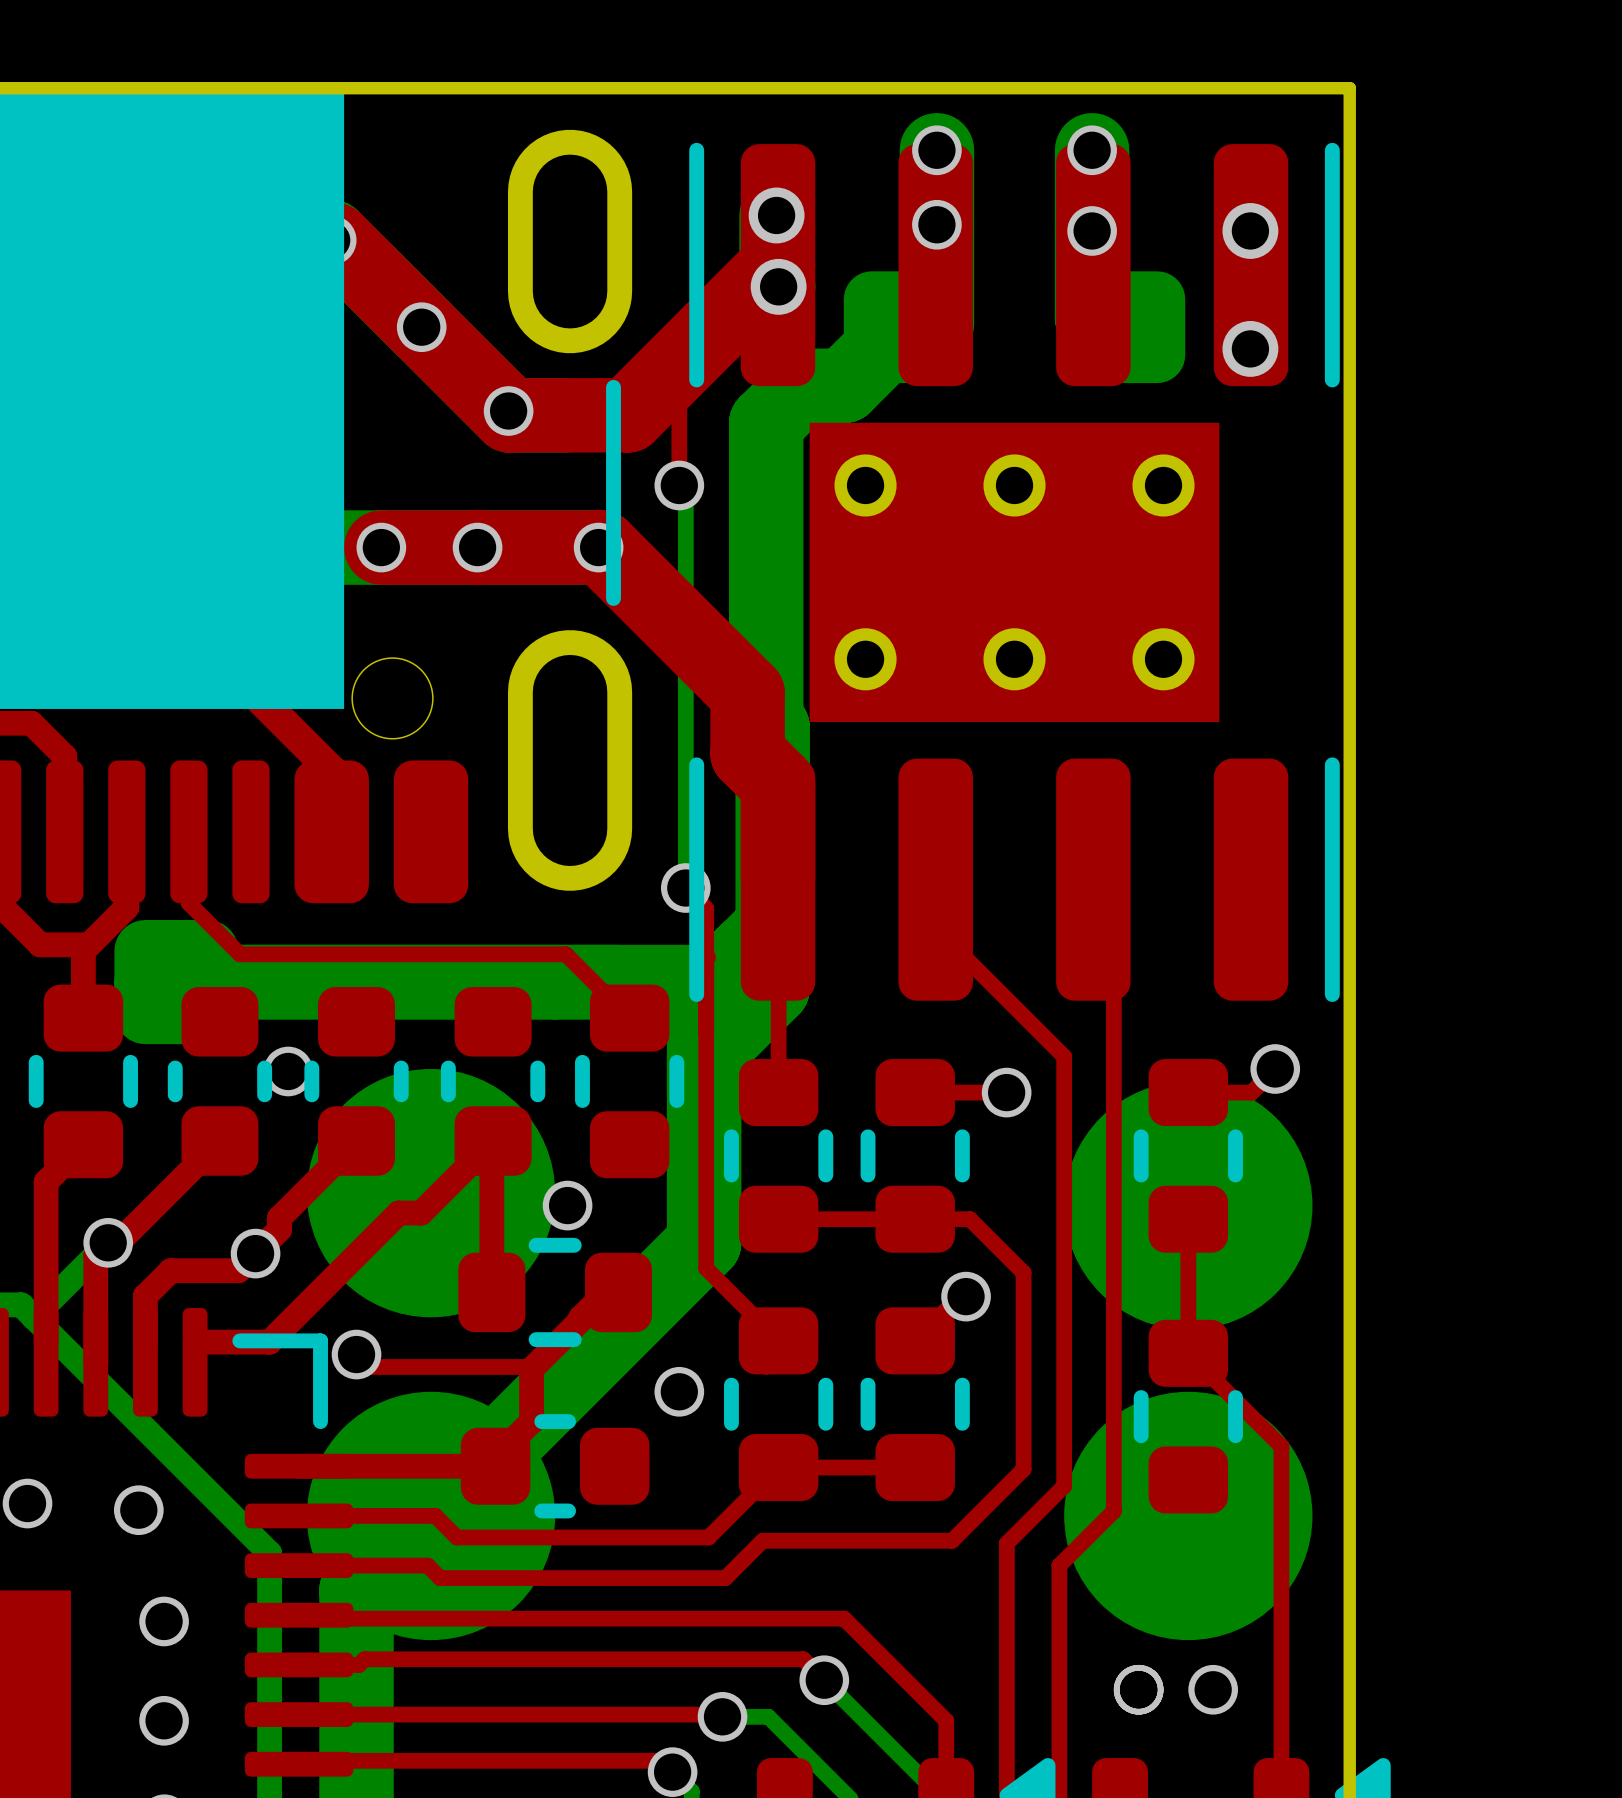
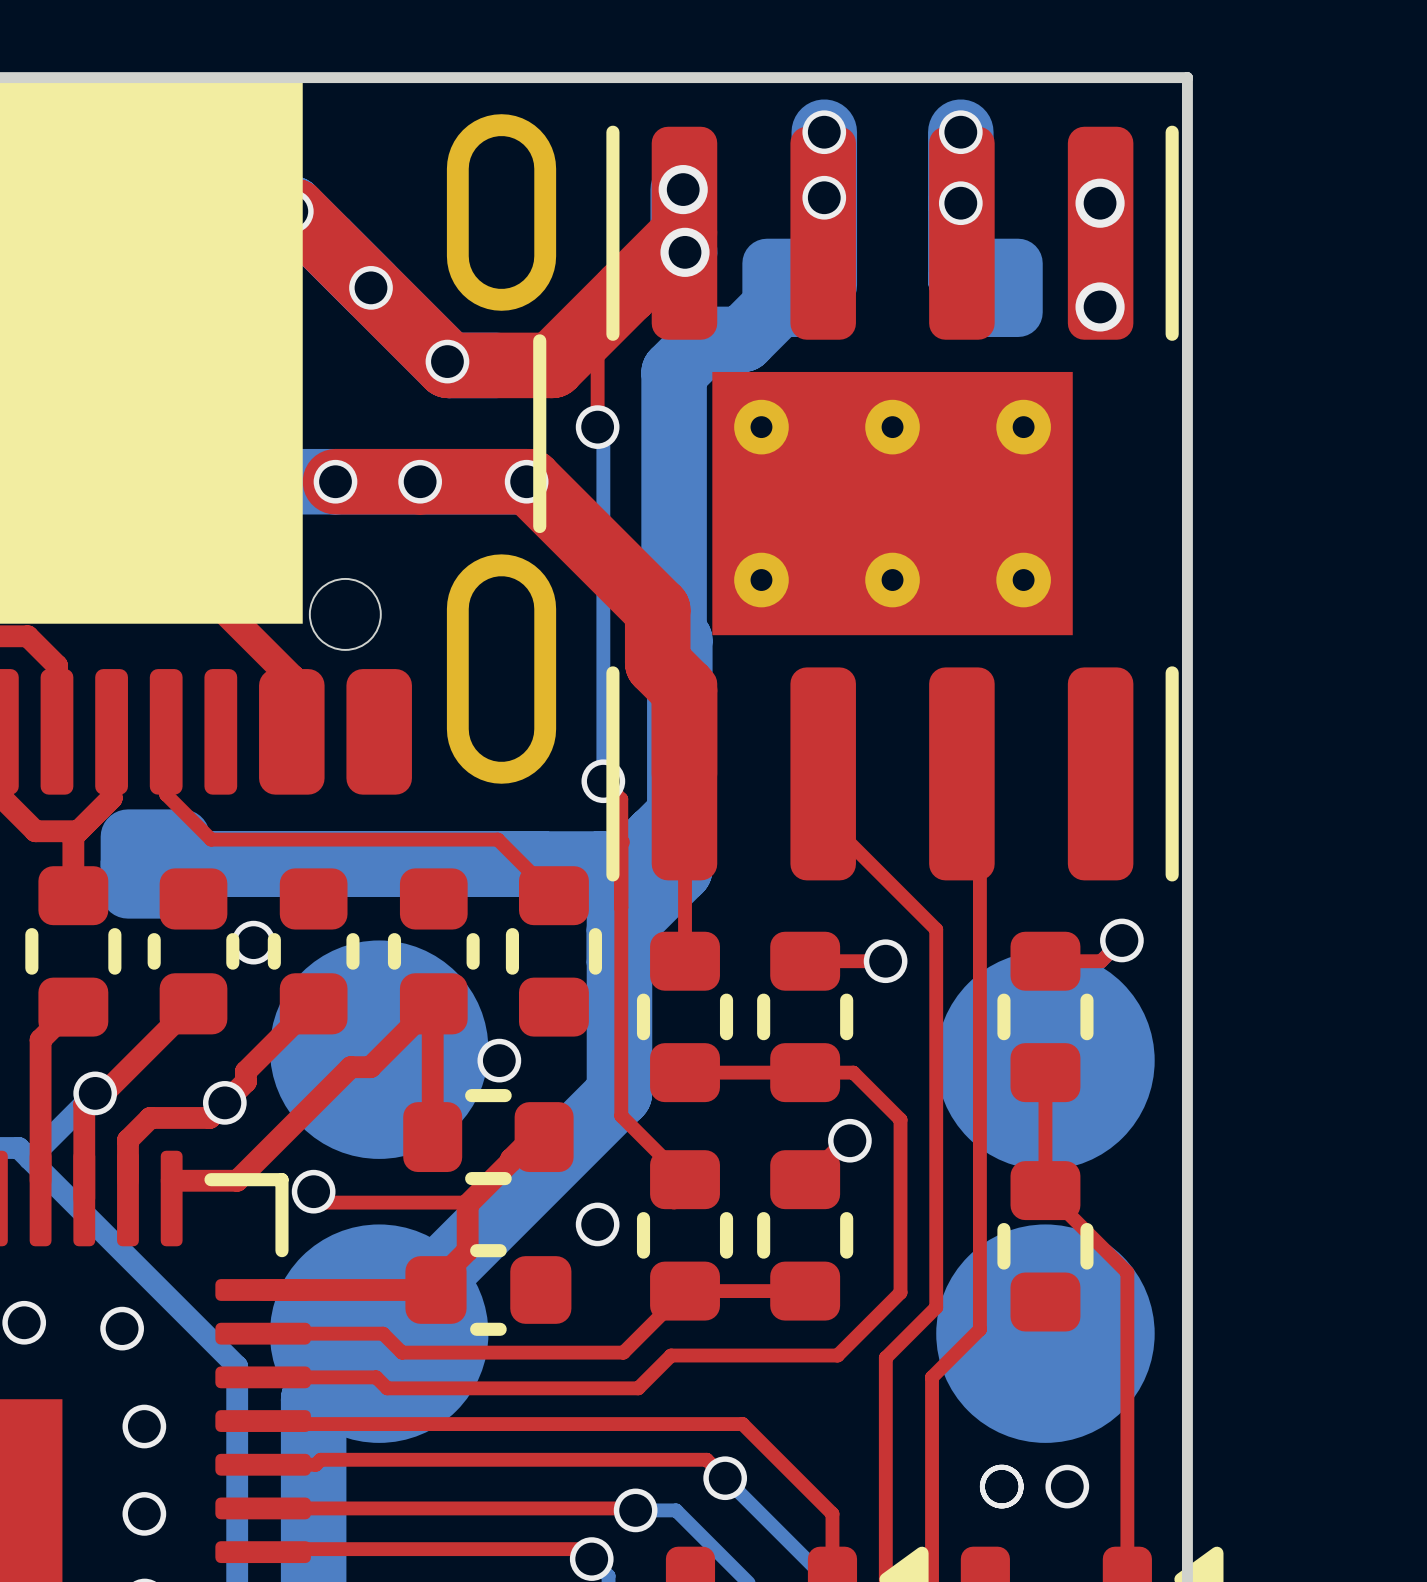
part footprint: [689, 142, 1340, 1002] -> [606, 125, 1179, 882]

